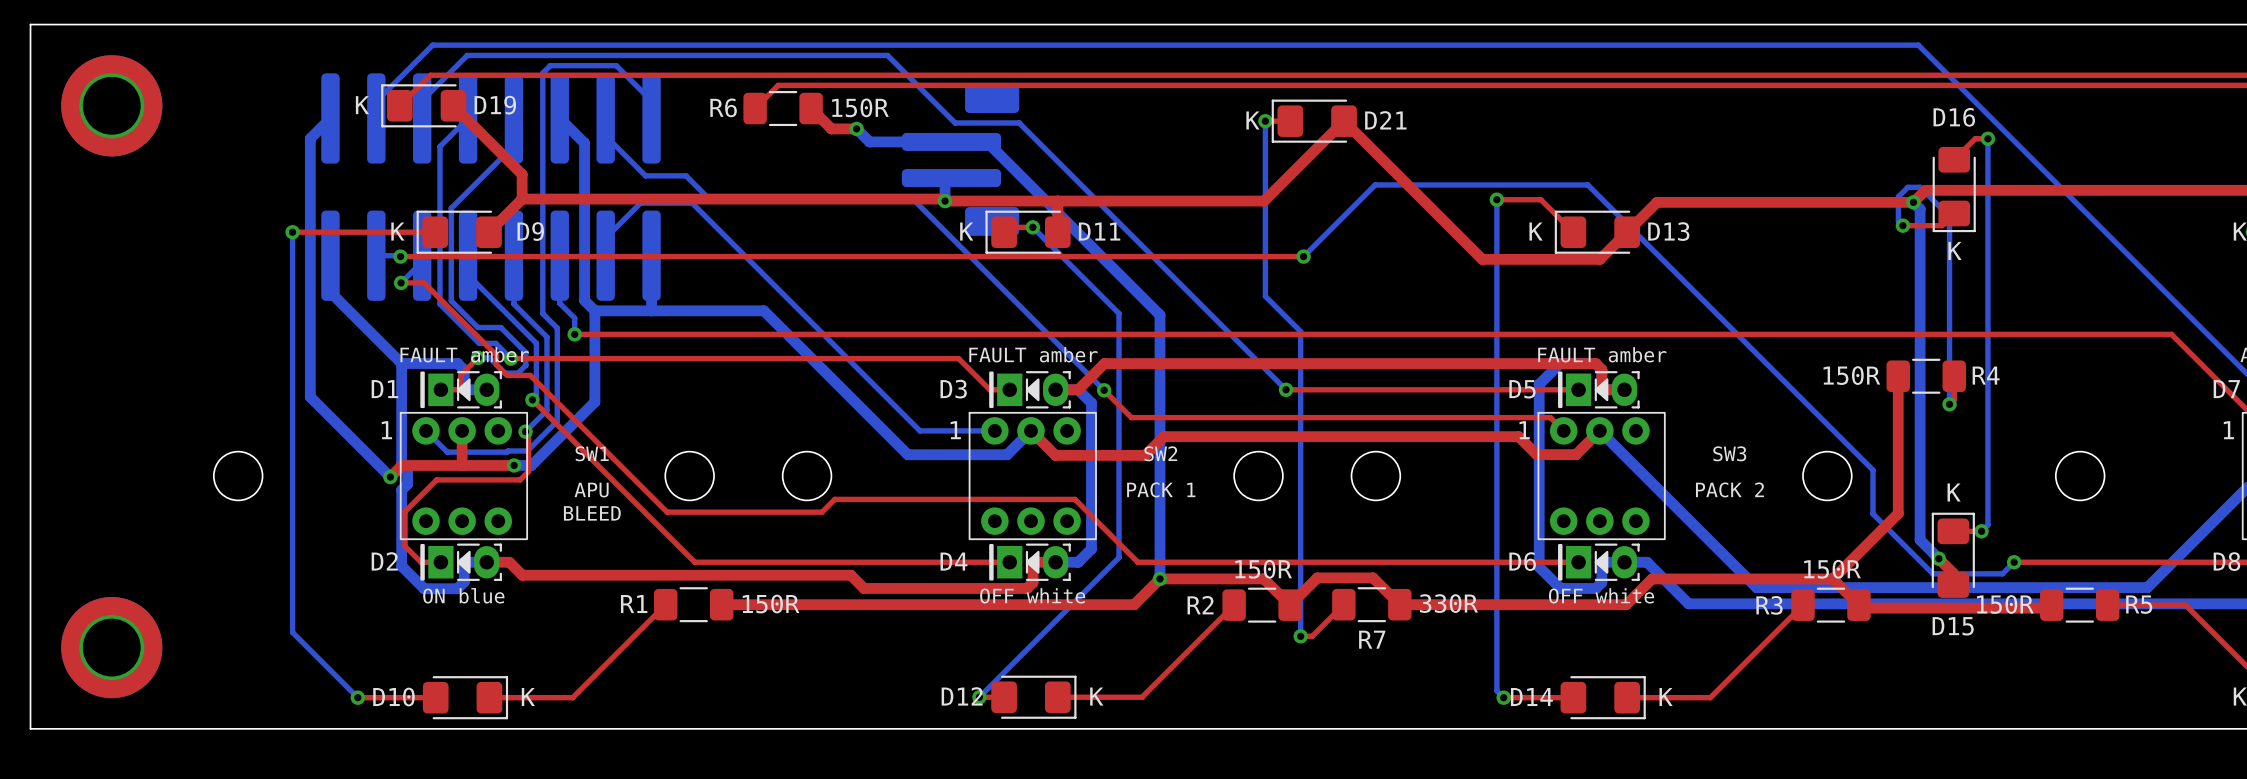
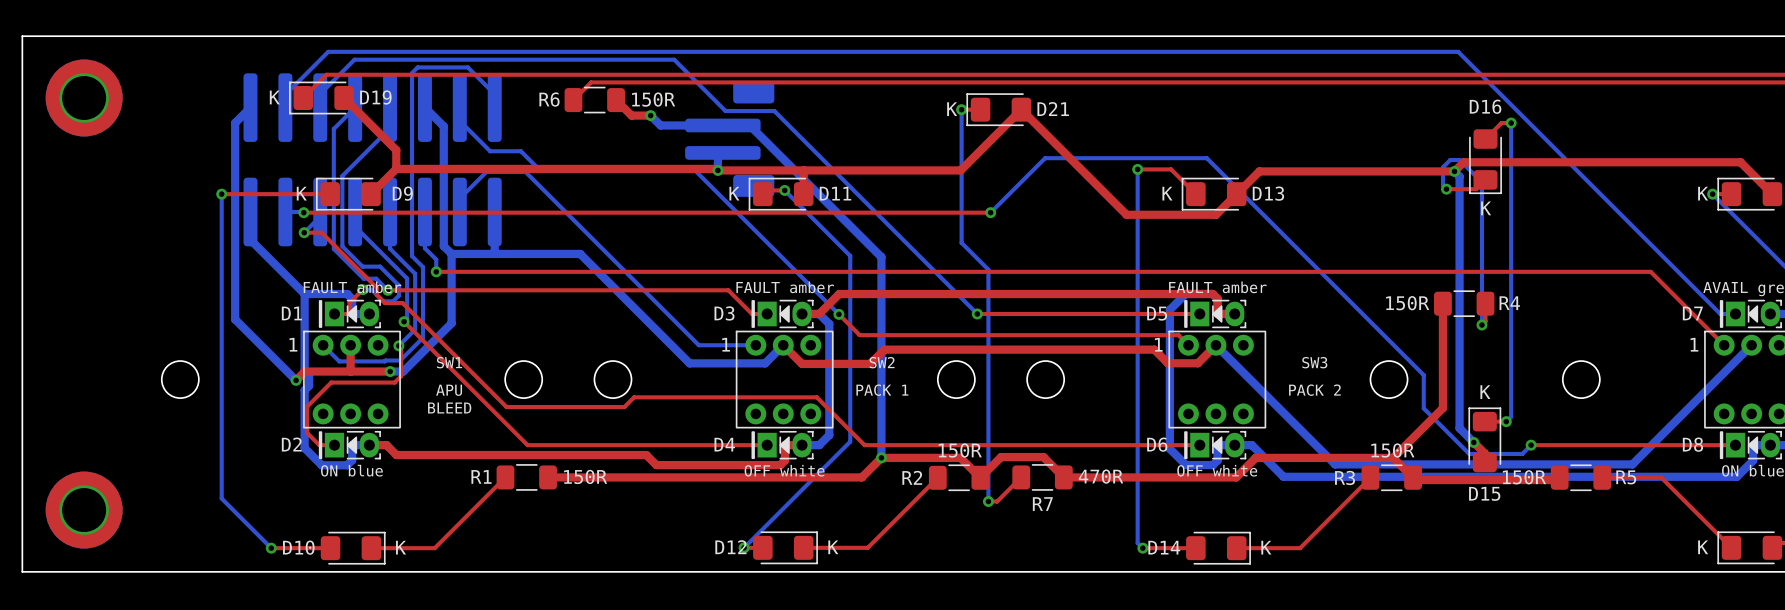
R7 text: 330R (1448, 603) -> 470R (1101, 476)

